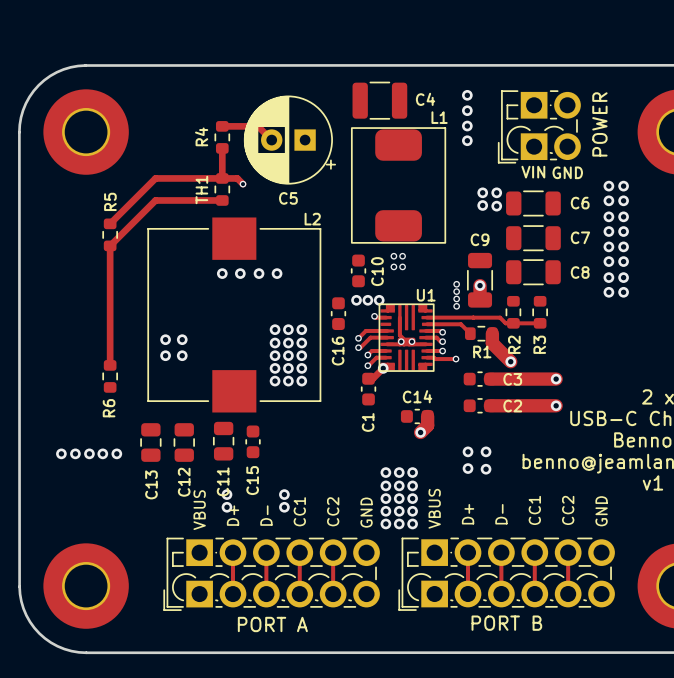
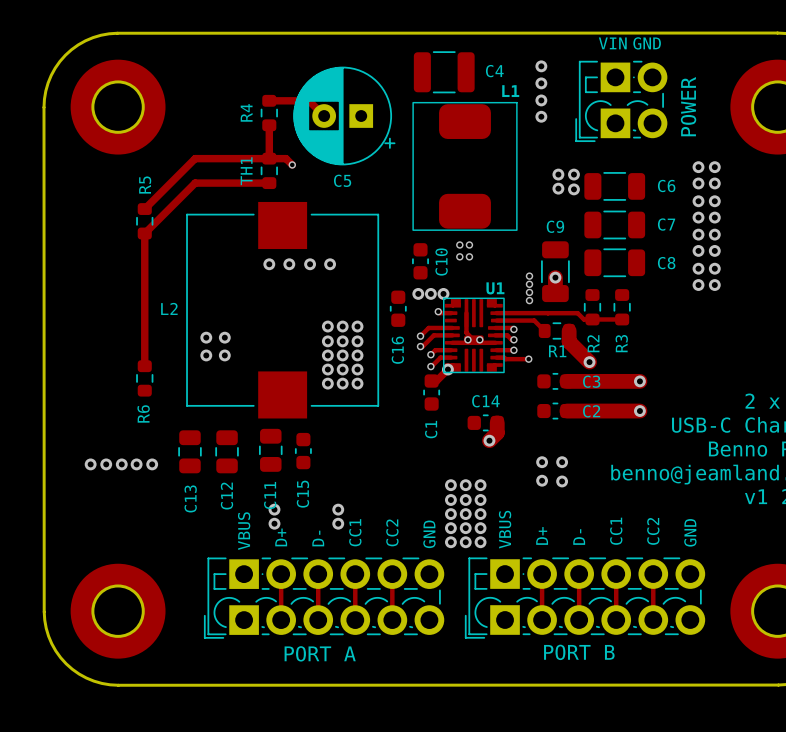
text position: VIN (533, 172) -> VIN (612, 43)
text position: GND (567, 172) -> GND (647, 43)
L2 name position: L2 (312, 219) -> L2 (169, 308)

